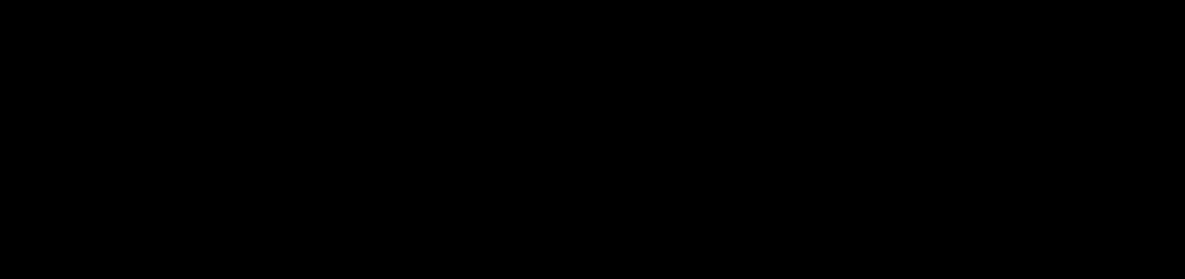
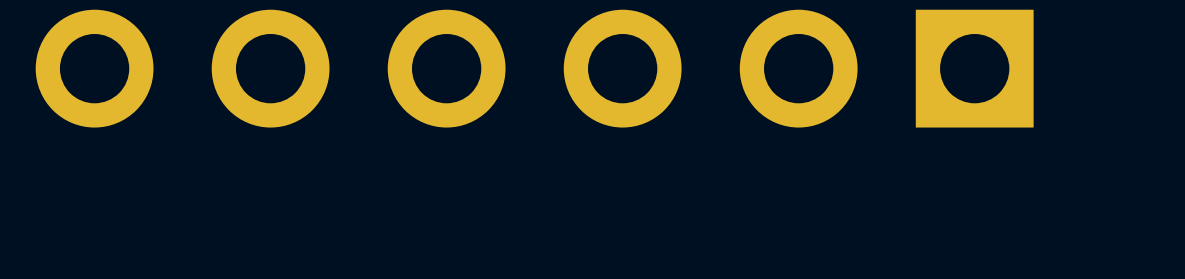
part: none -> (534, 68)

